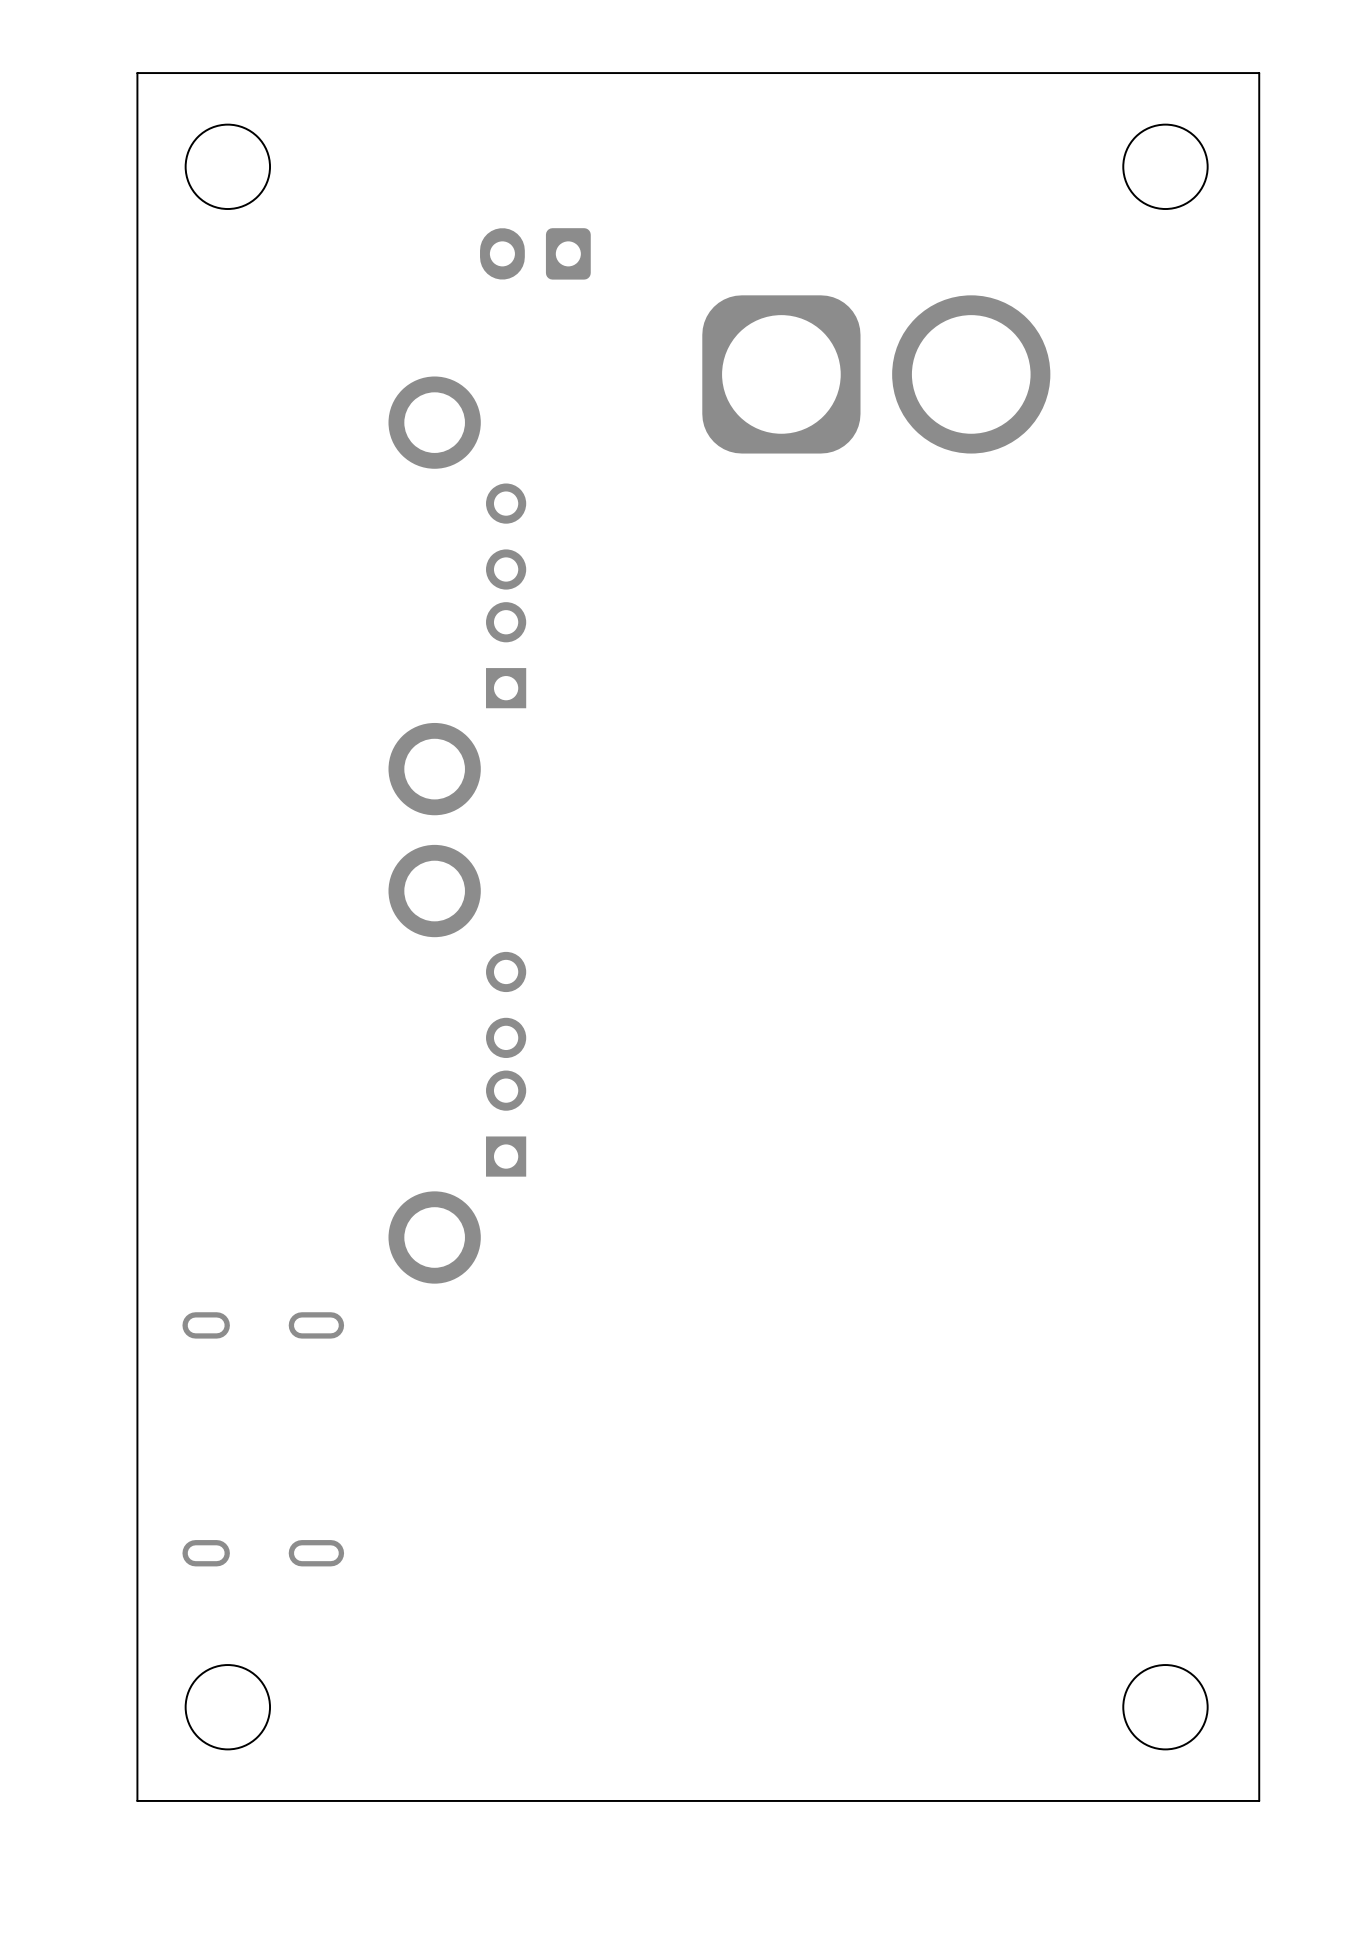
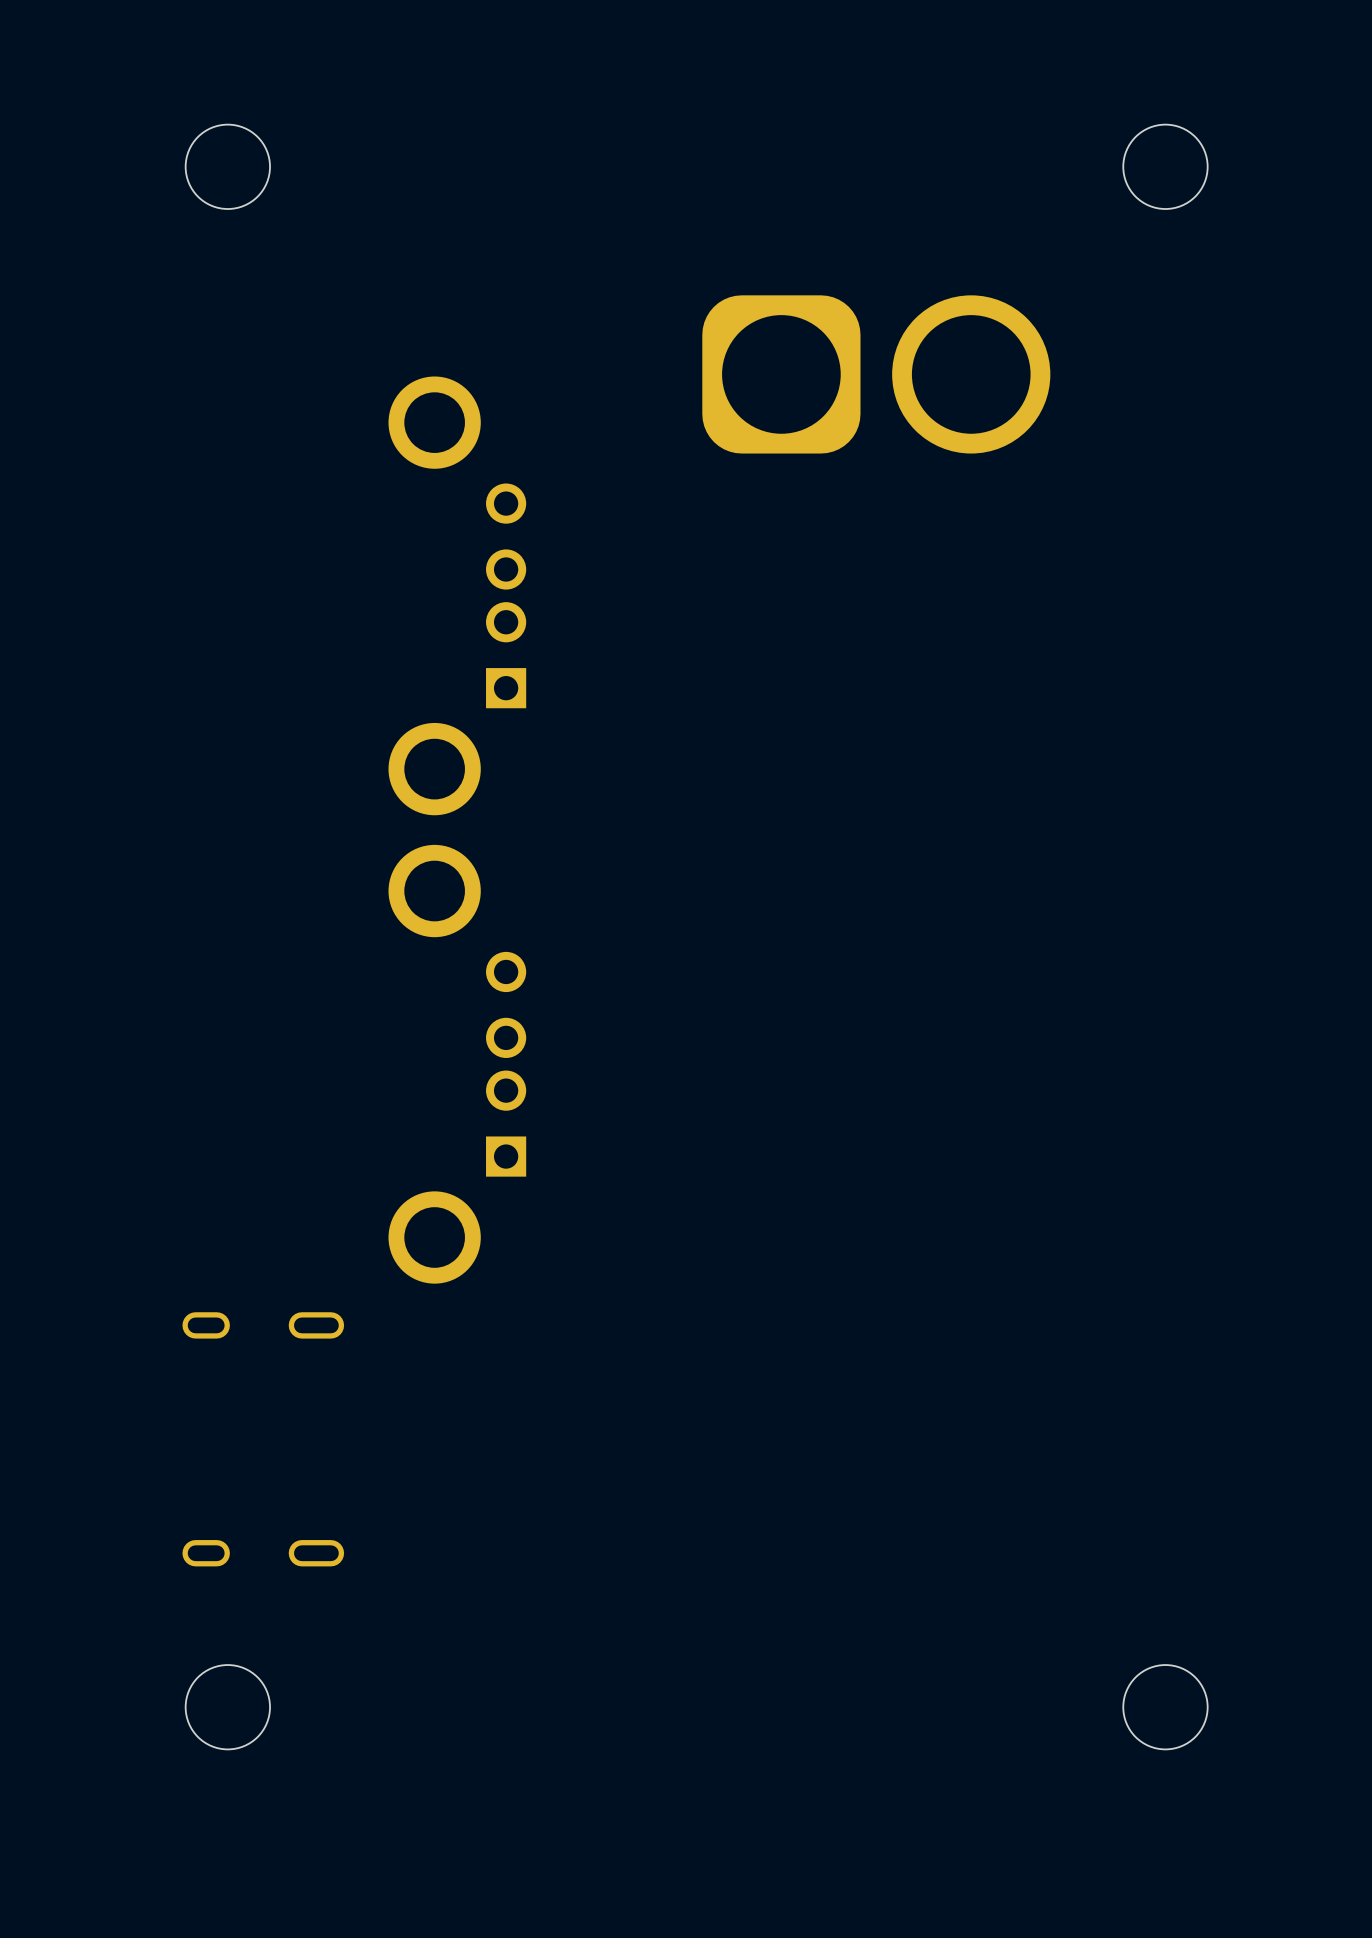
board edge: (1259, 73) (137, 73) (137, 1800) (1259, 1800) (1259, 73) -> none
part: (535, 253) -> none

